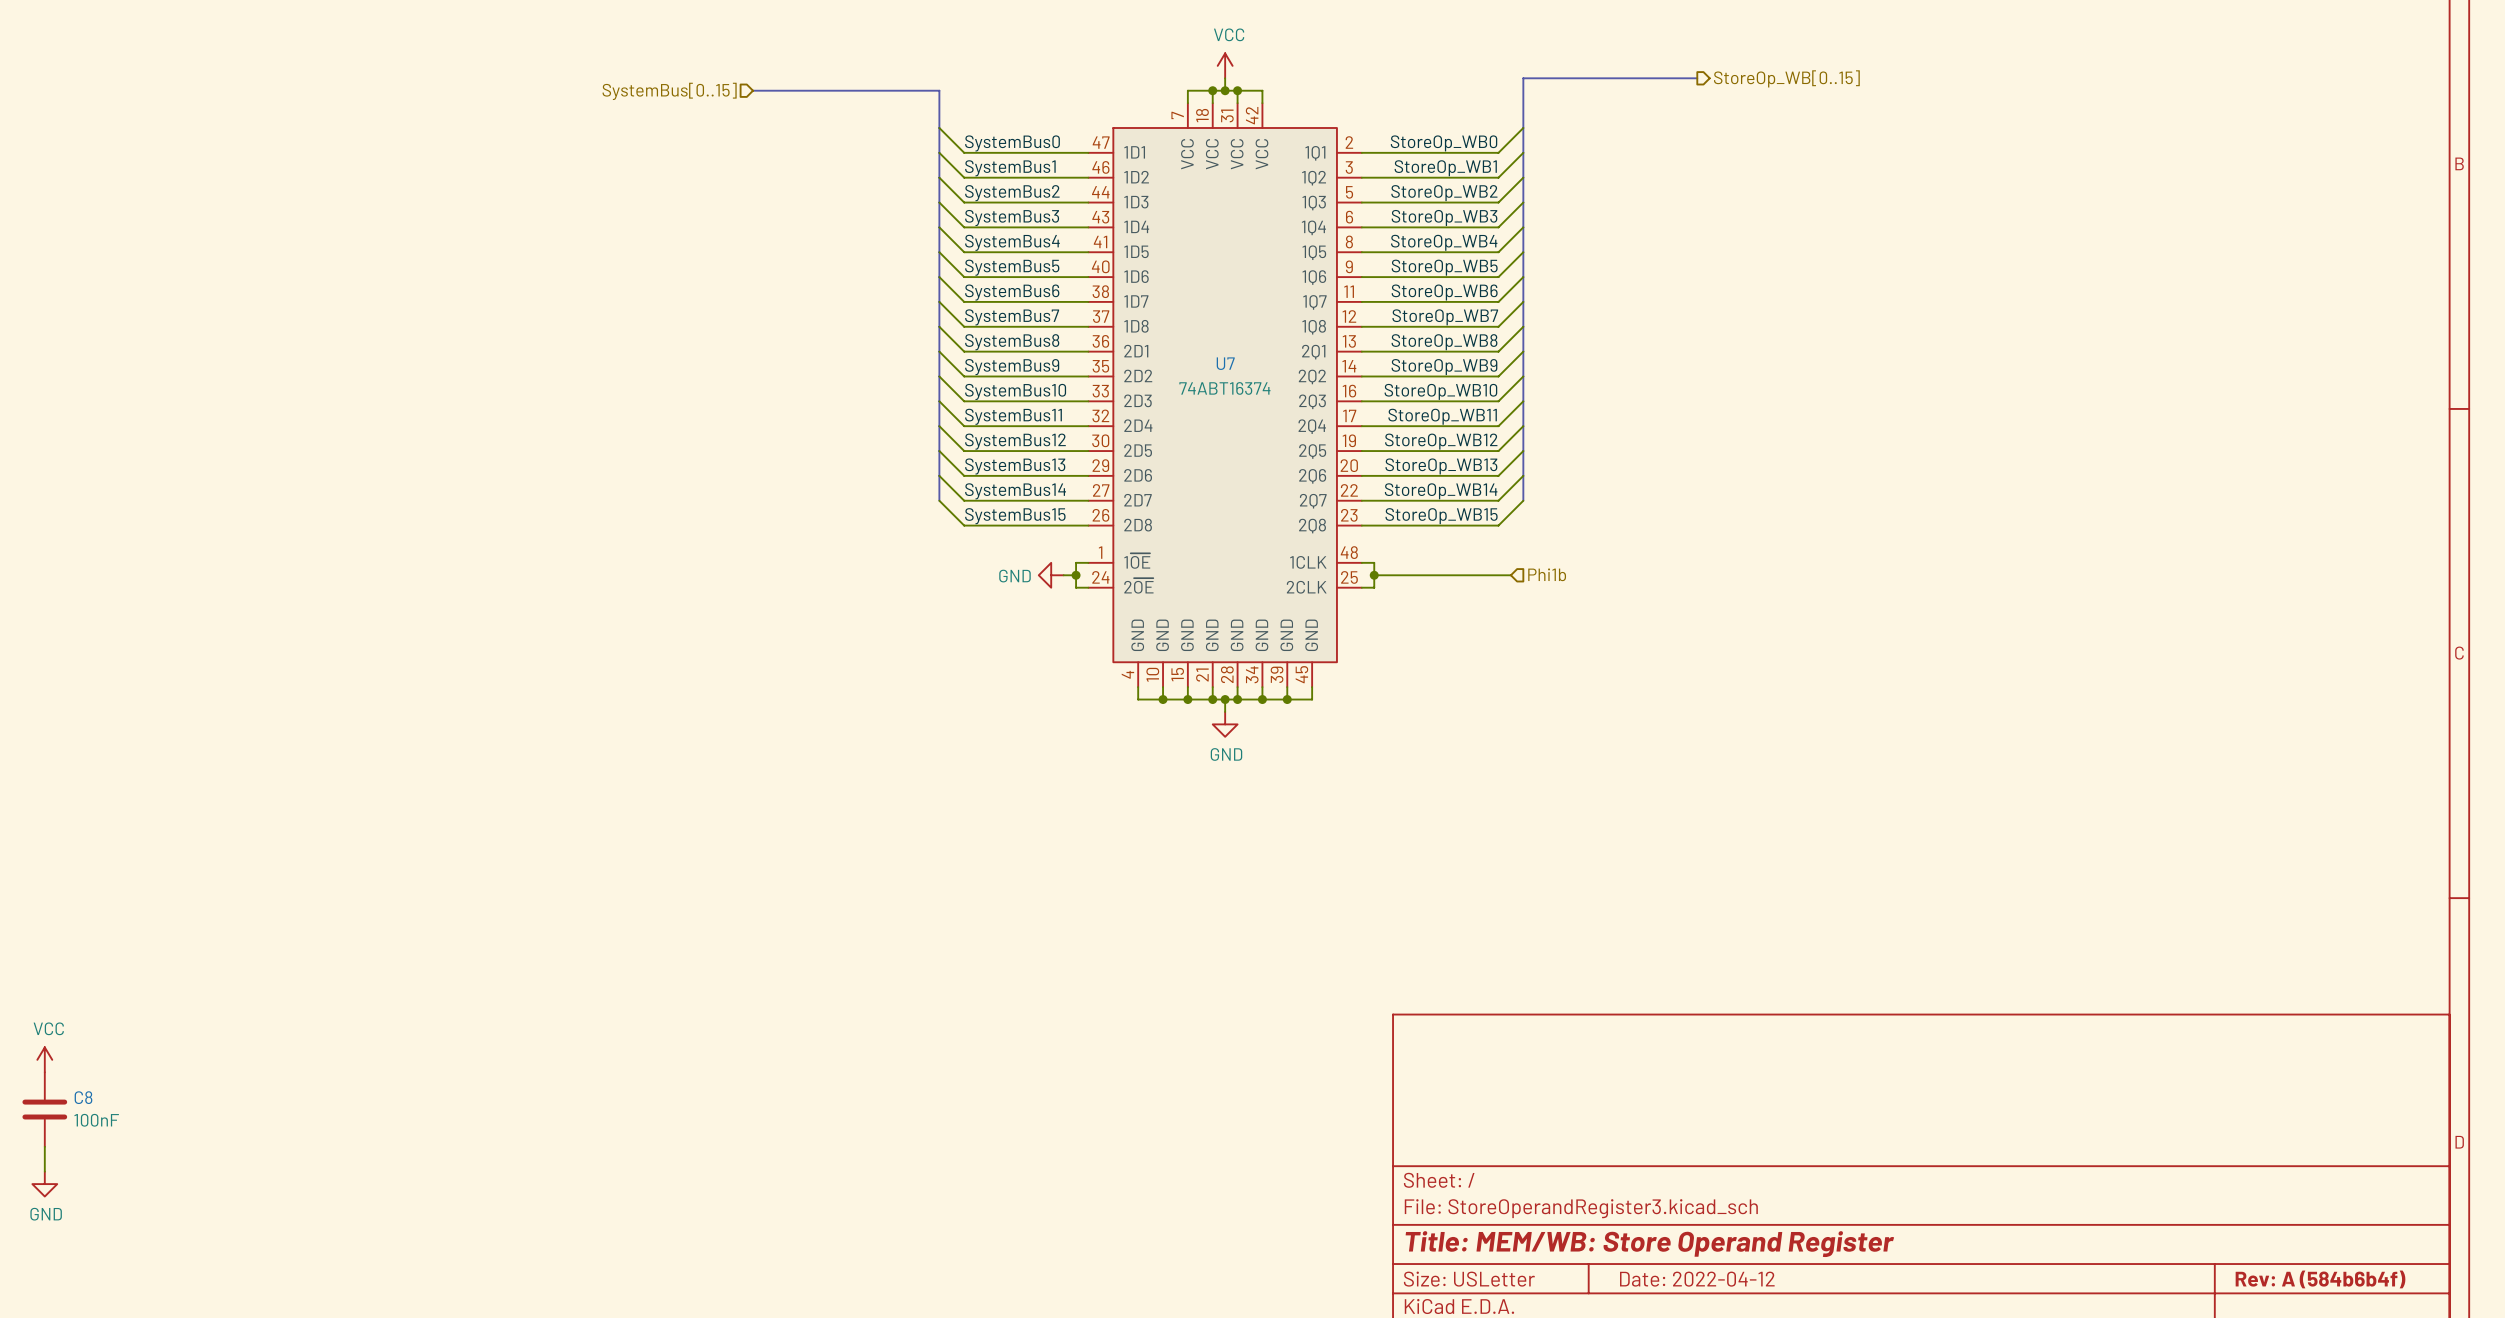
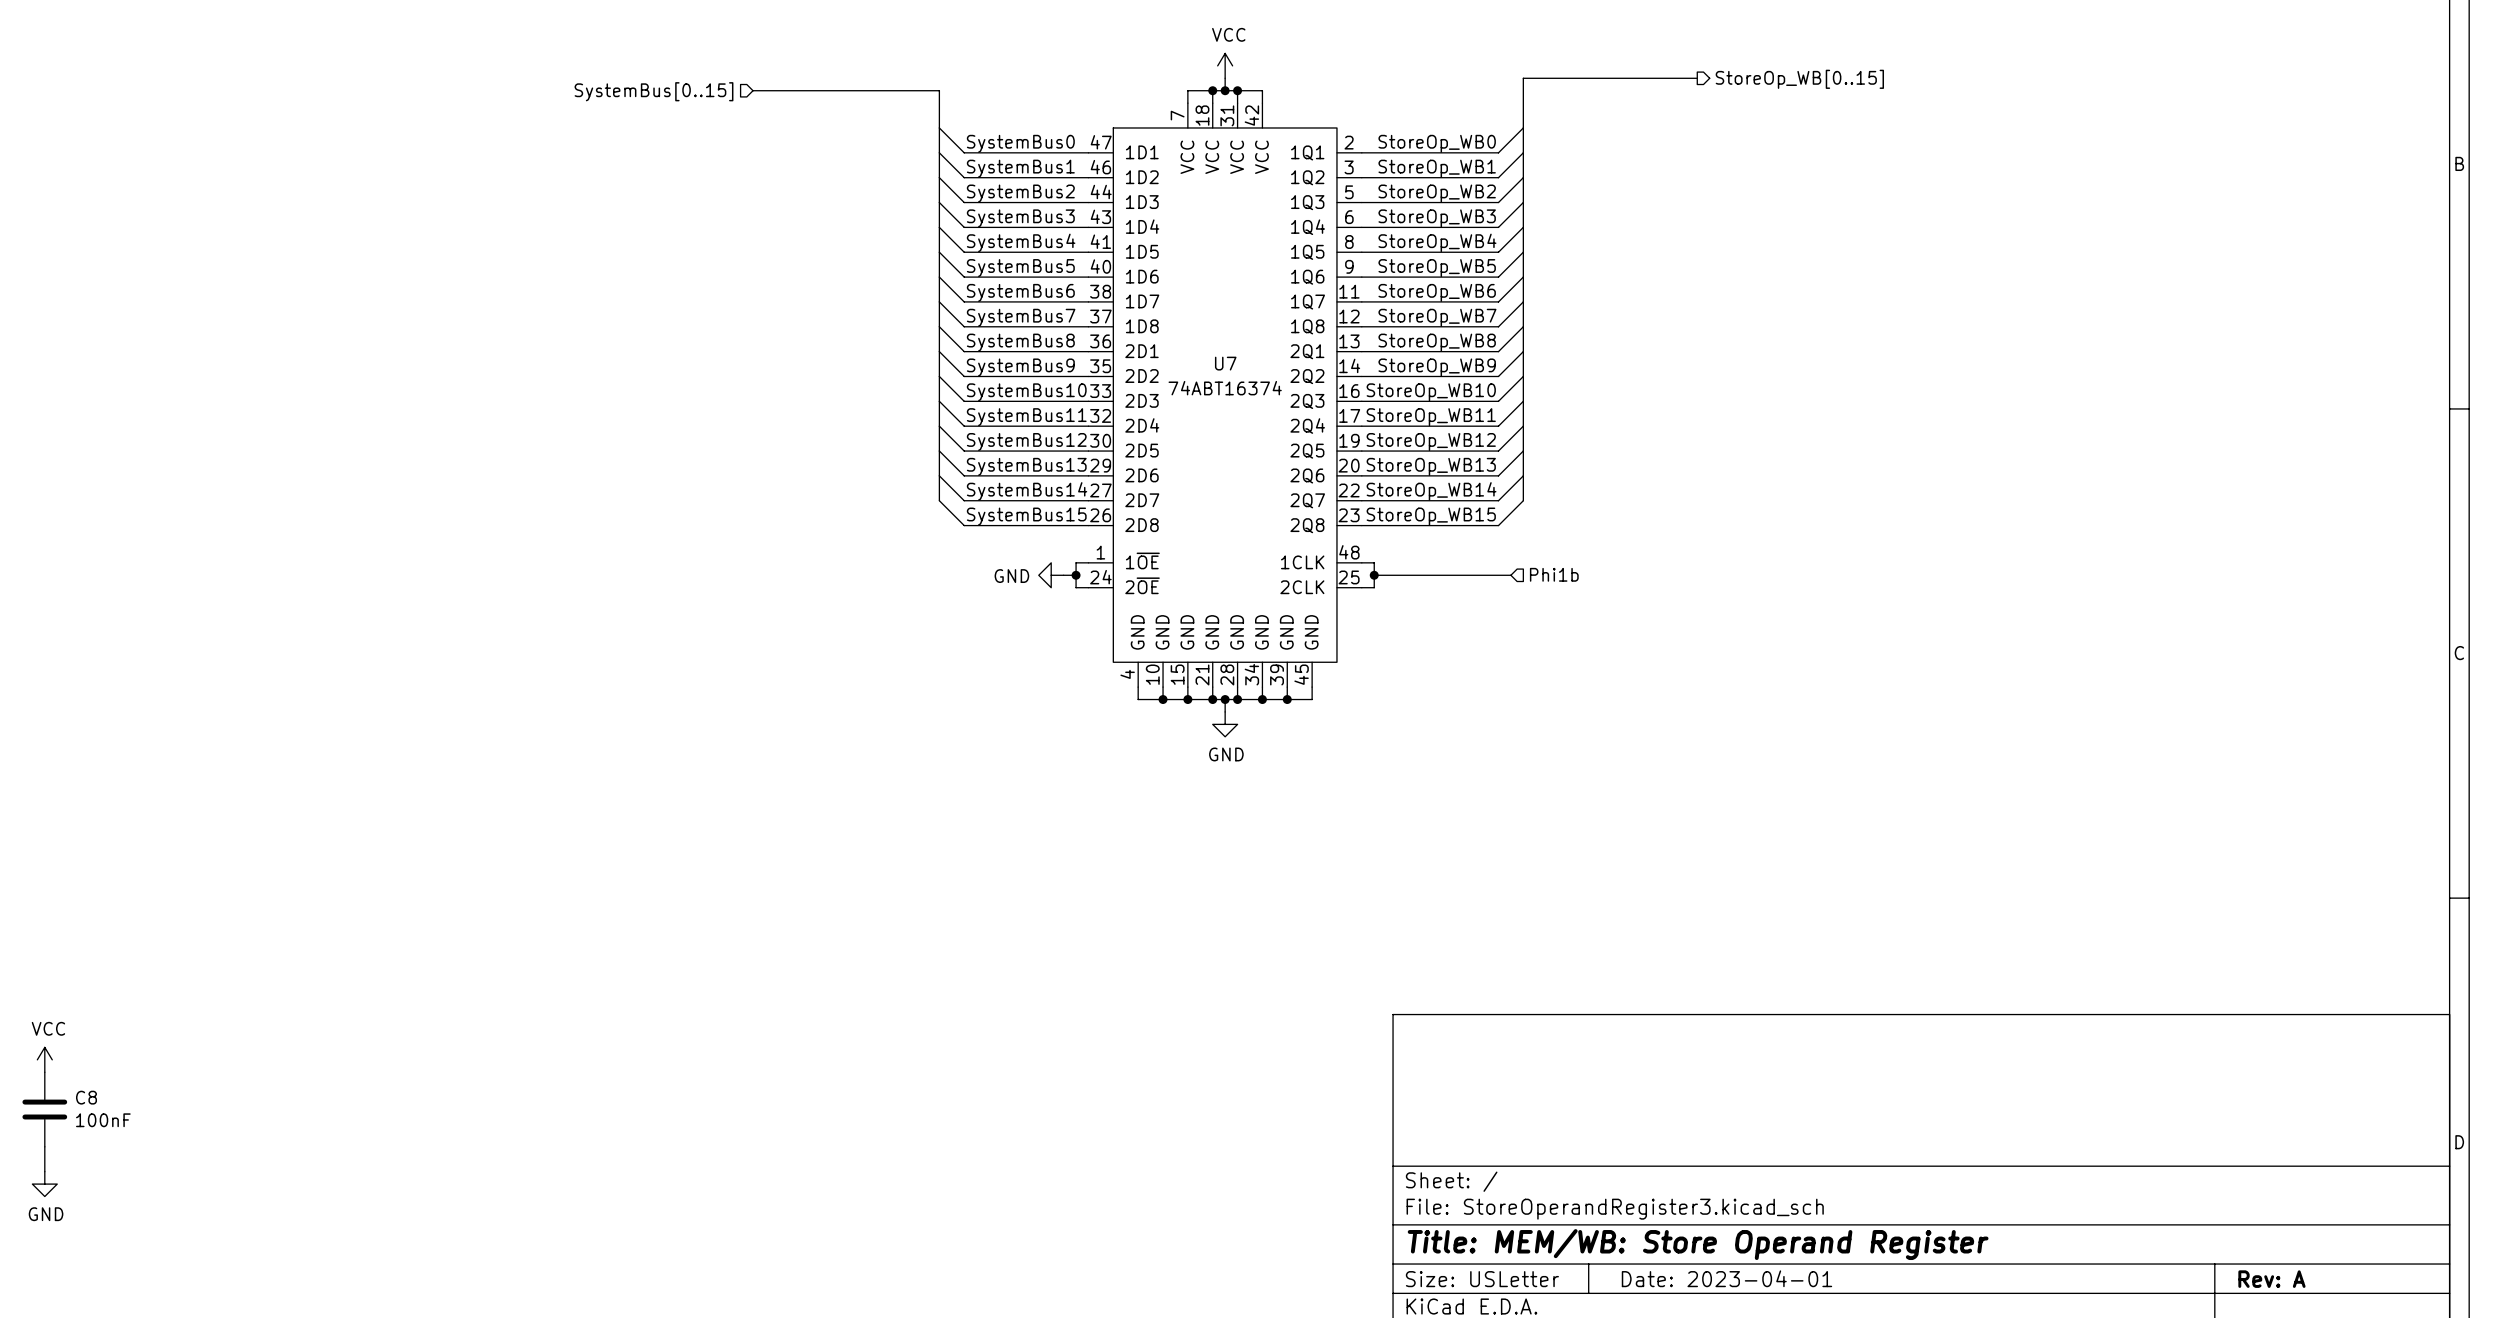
title block: Date: 2022-04-12 (1697, 1279) -> Date: 2023-04-01 (1726, 1278)
title block: Rev: A (584b6b4f) (2320, 1279) -> Rev: A (2271, 1279)

